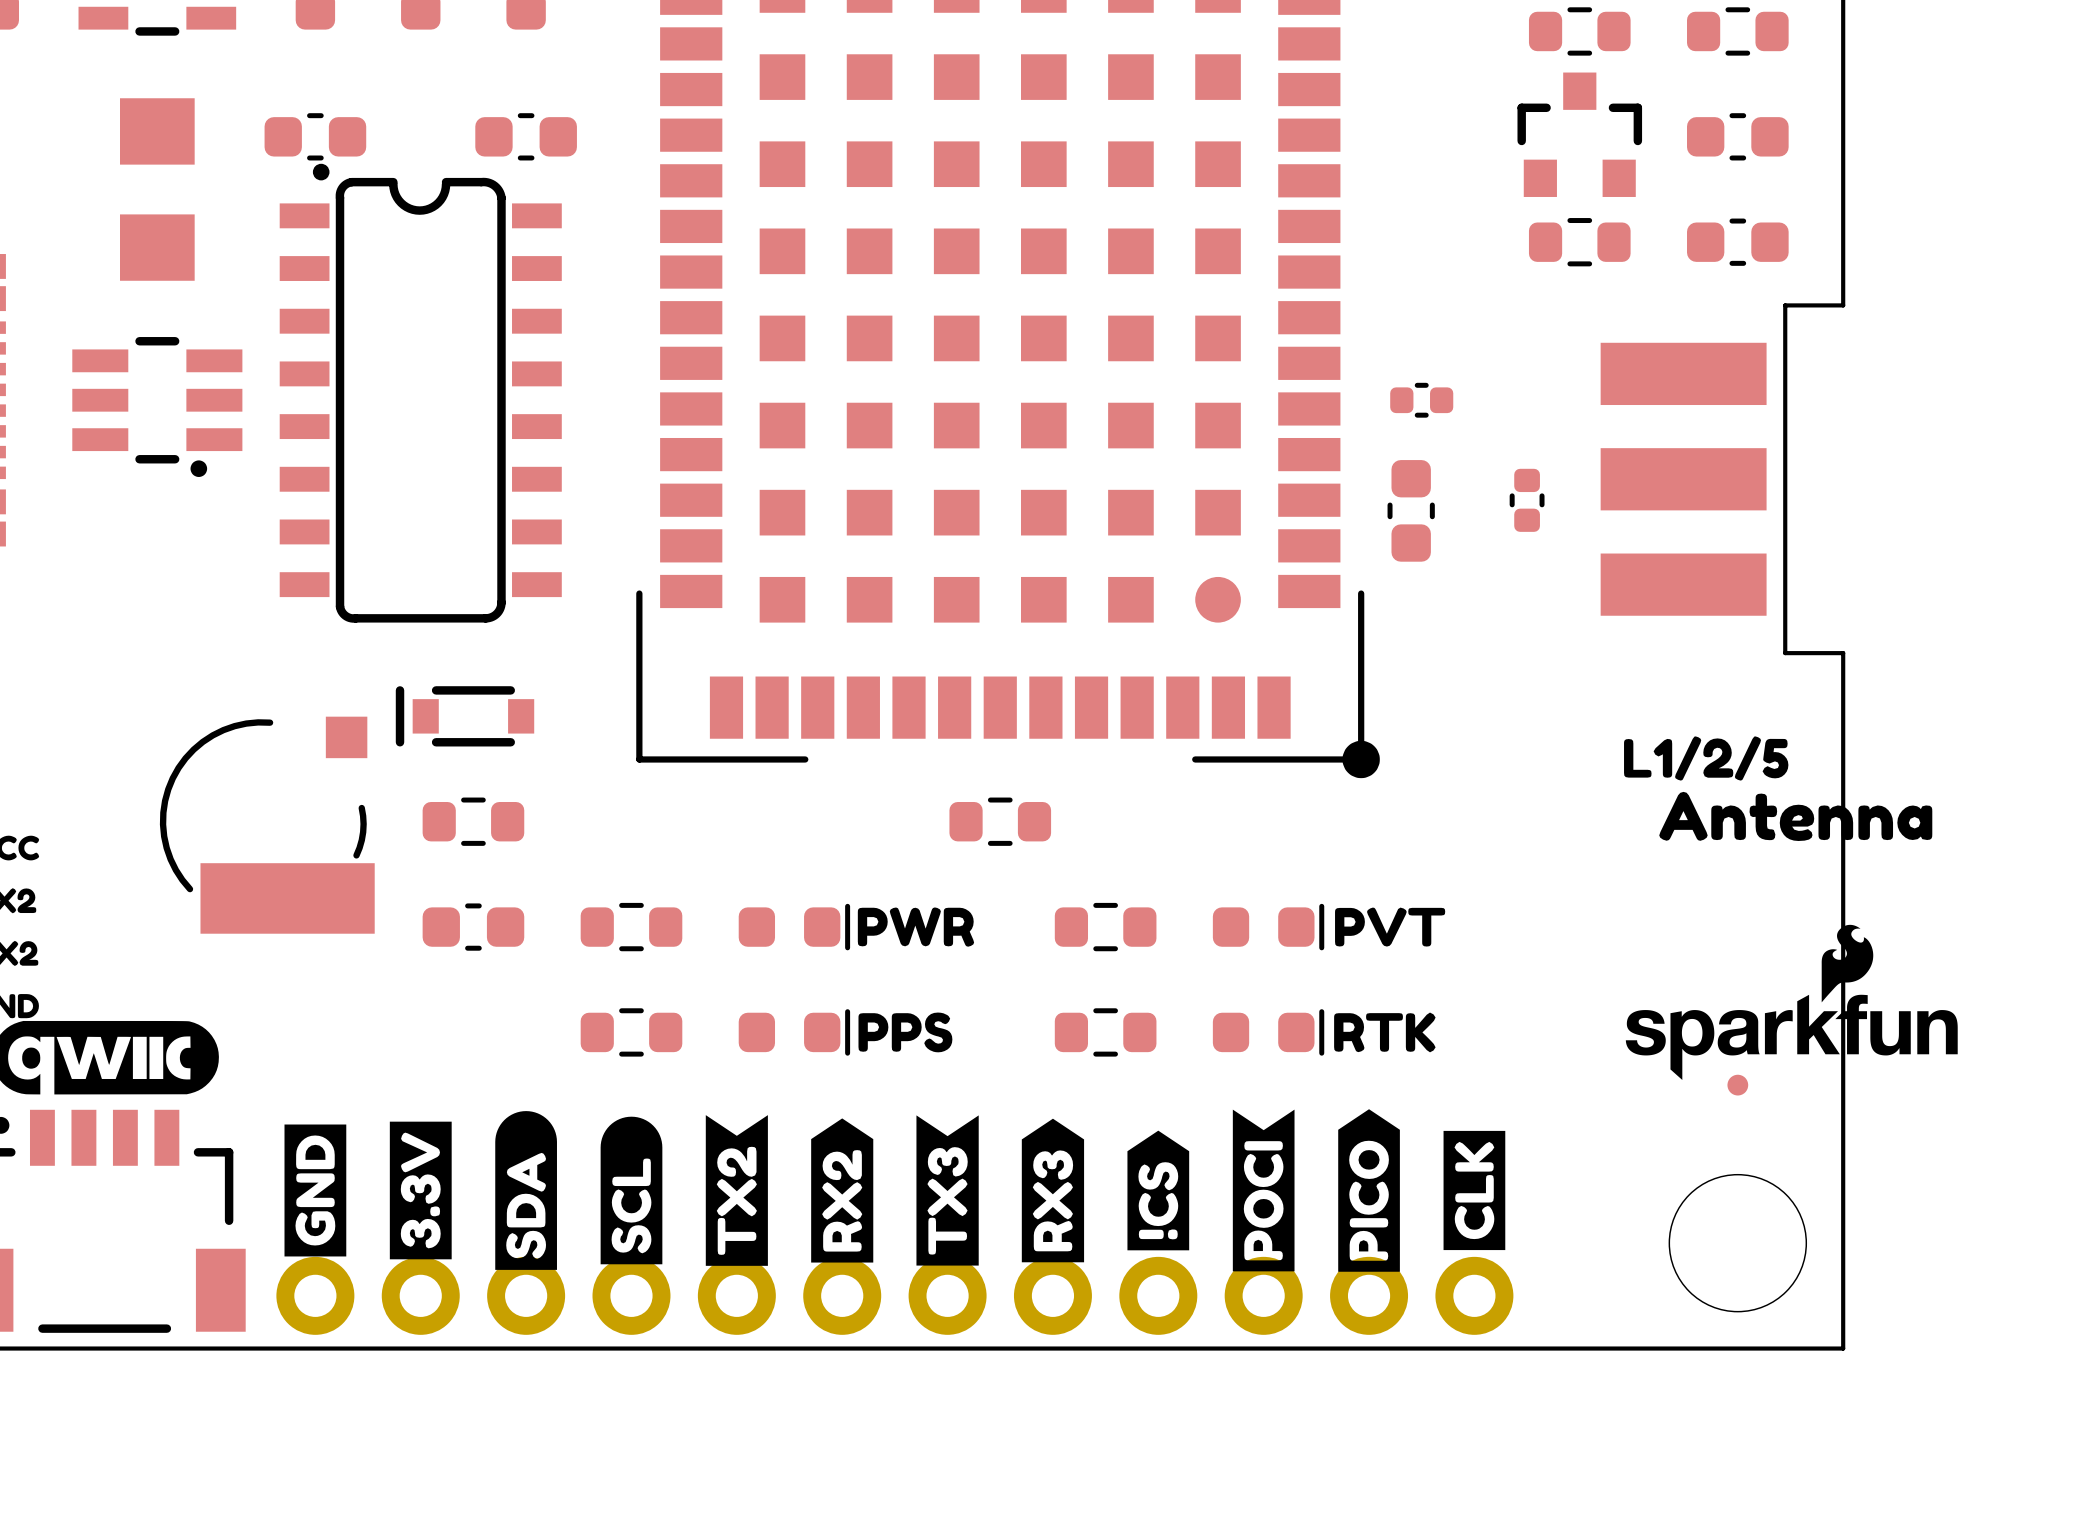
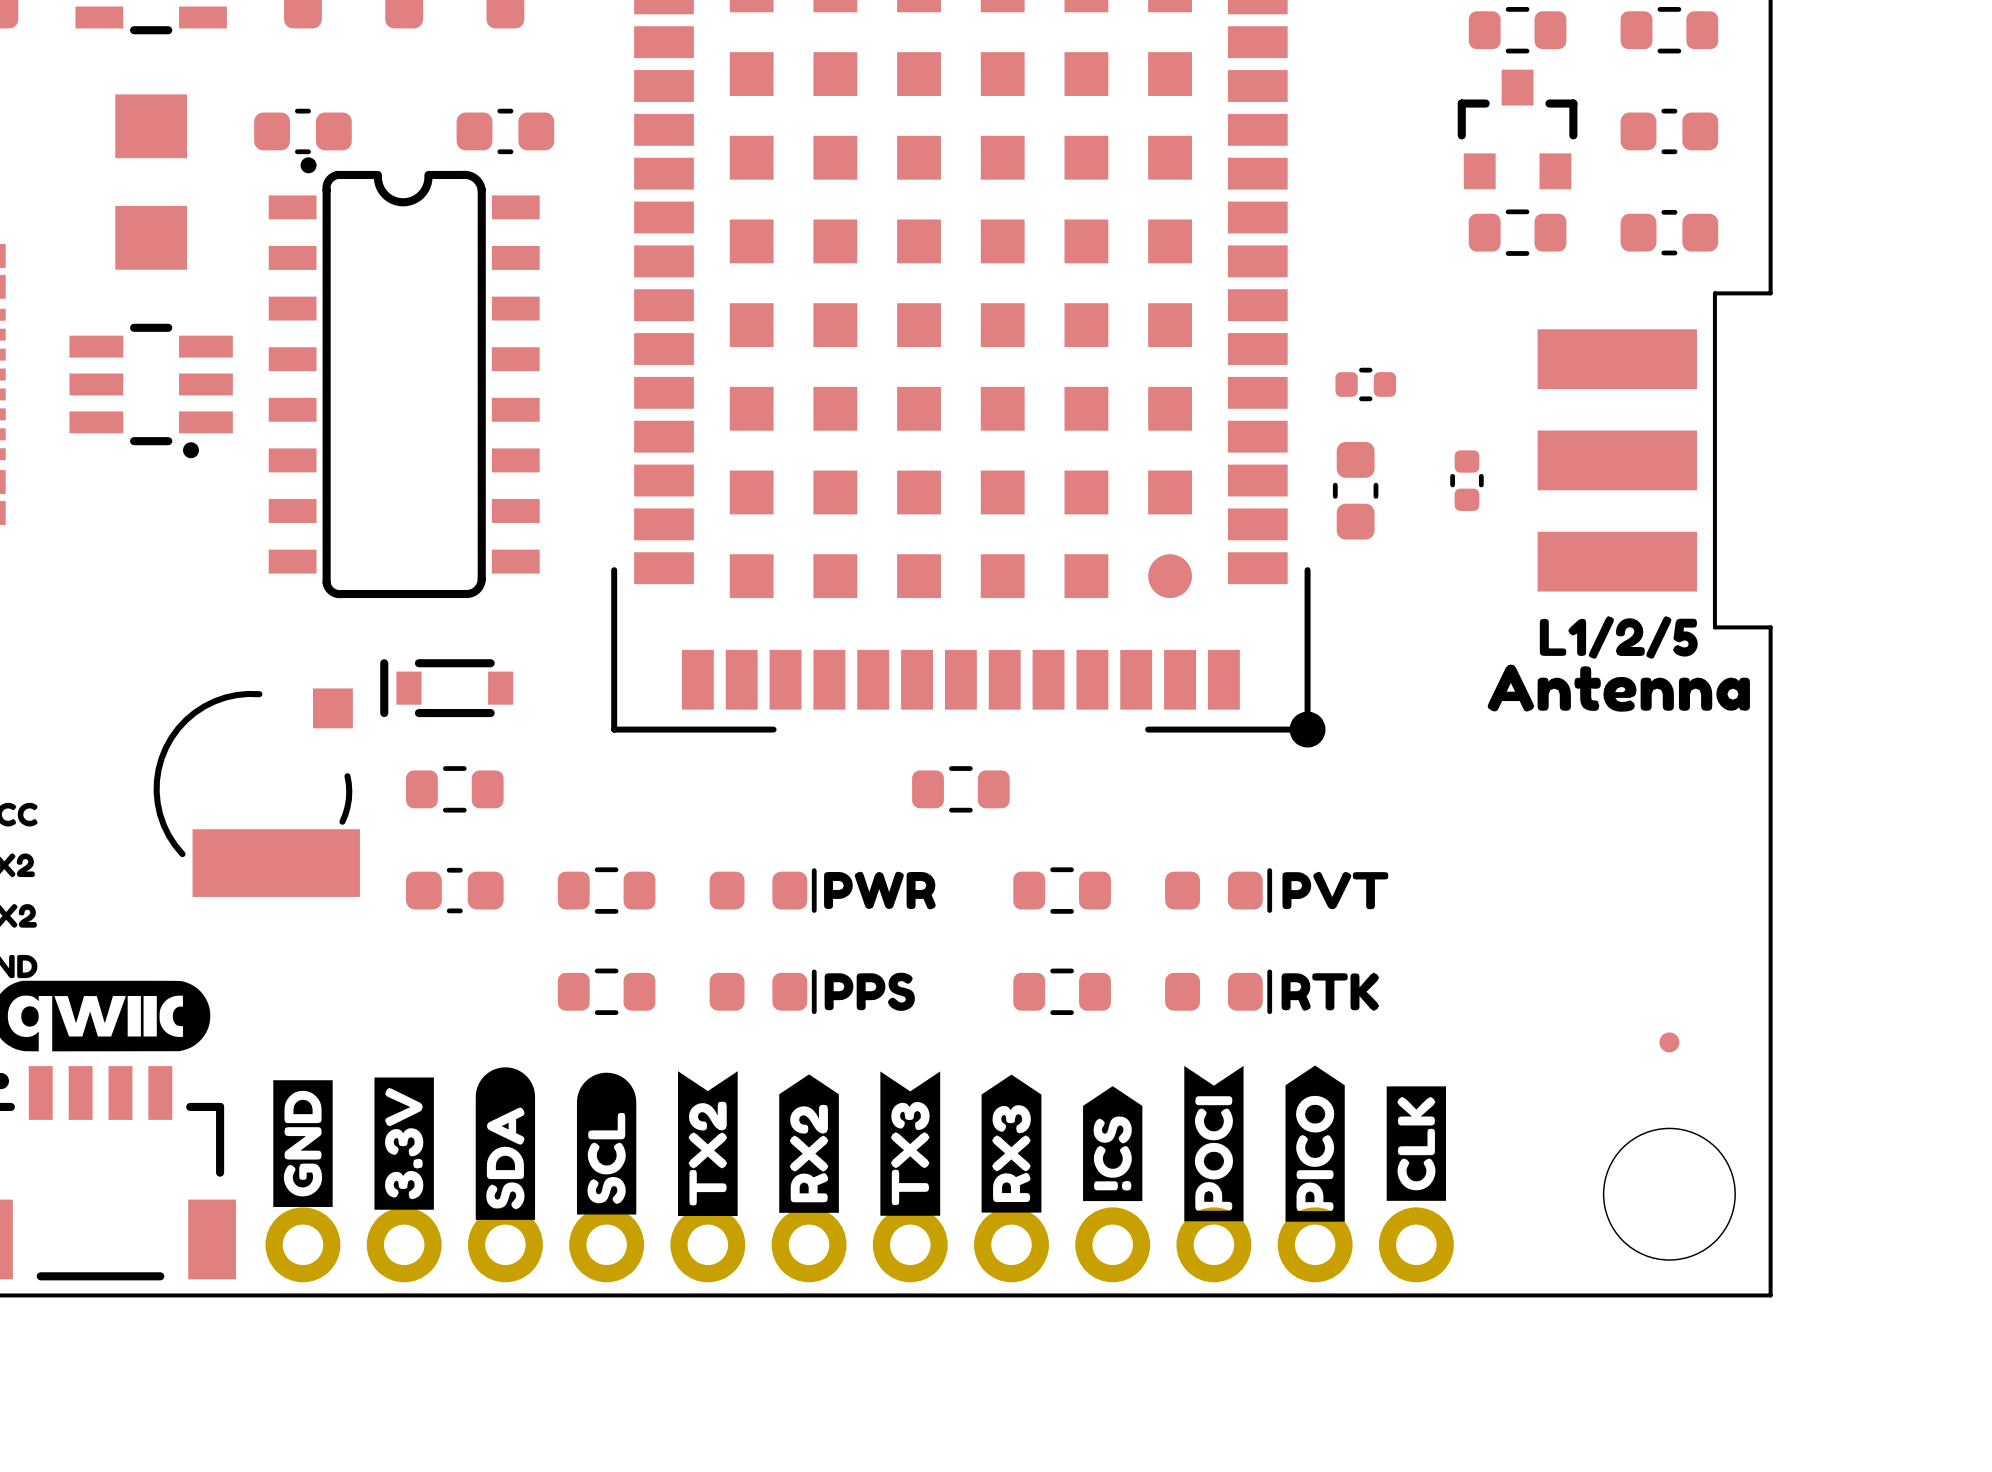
drawing position: (1706, 758) -> (1618, 637)
drawing position: (1795, 816) -> (1618, 688)
drawing: [1625, 924, 1958, 1080] -> none

